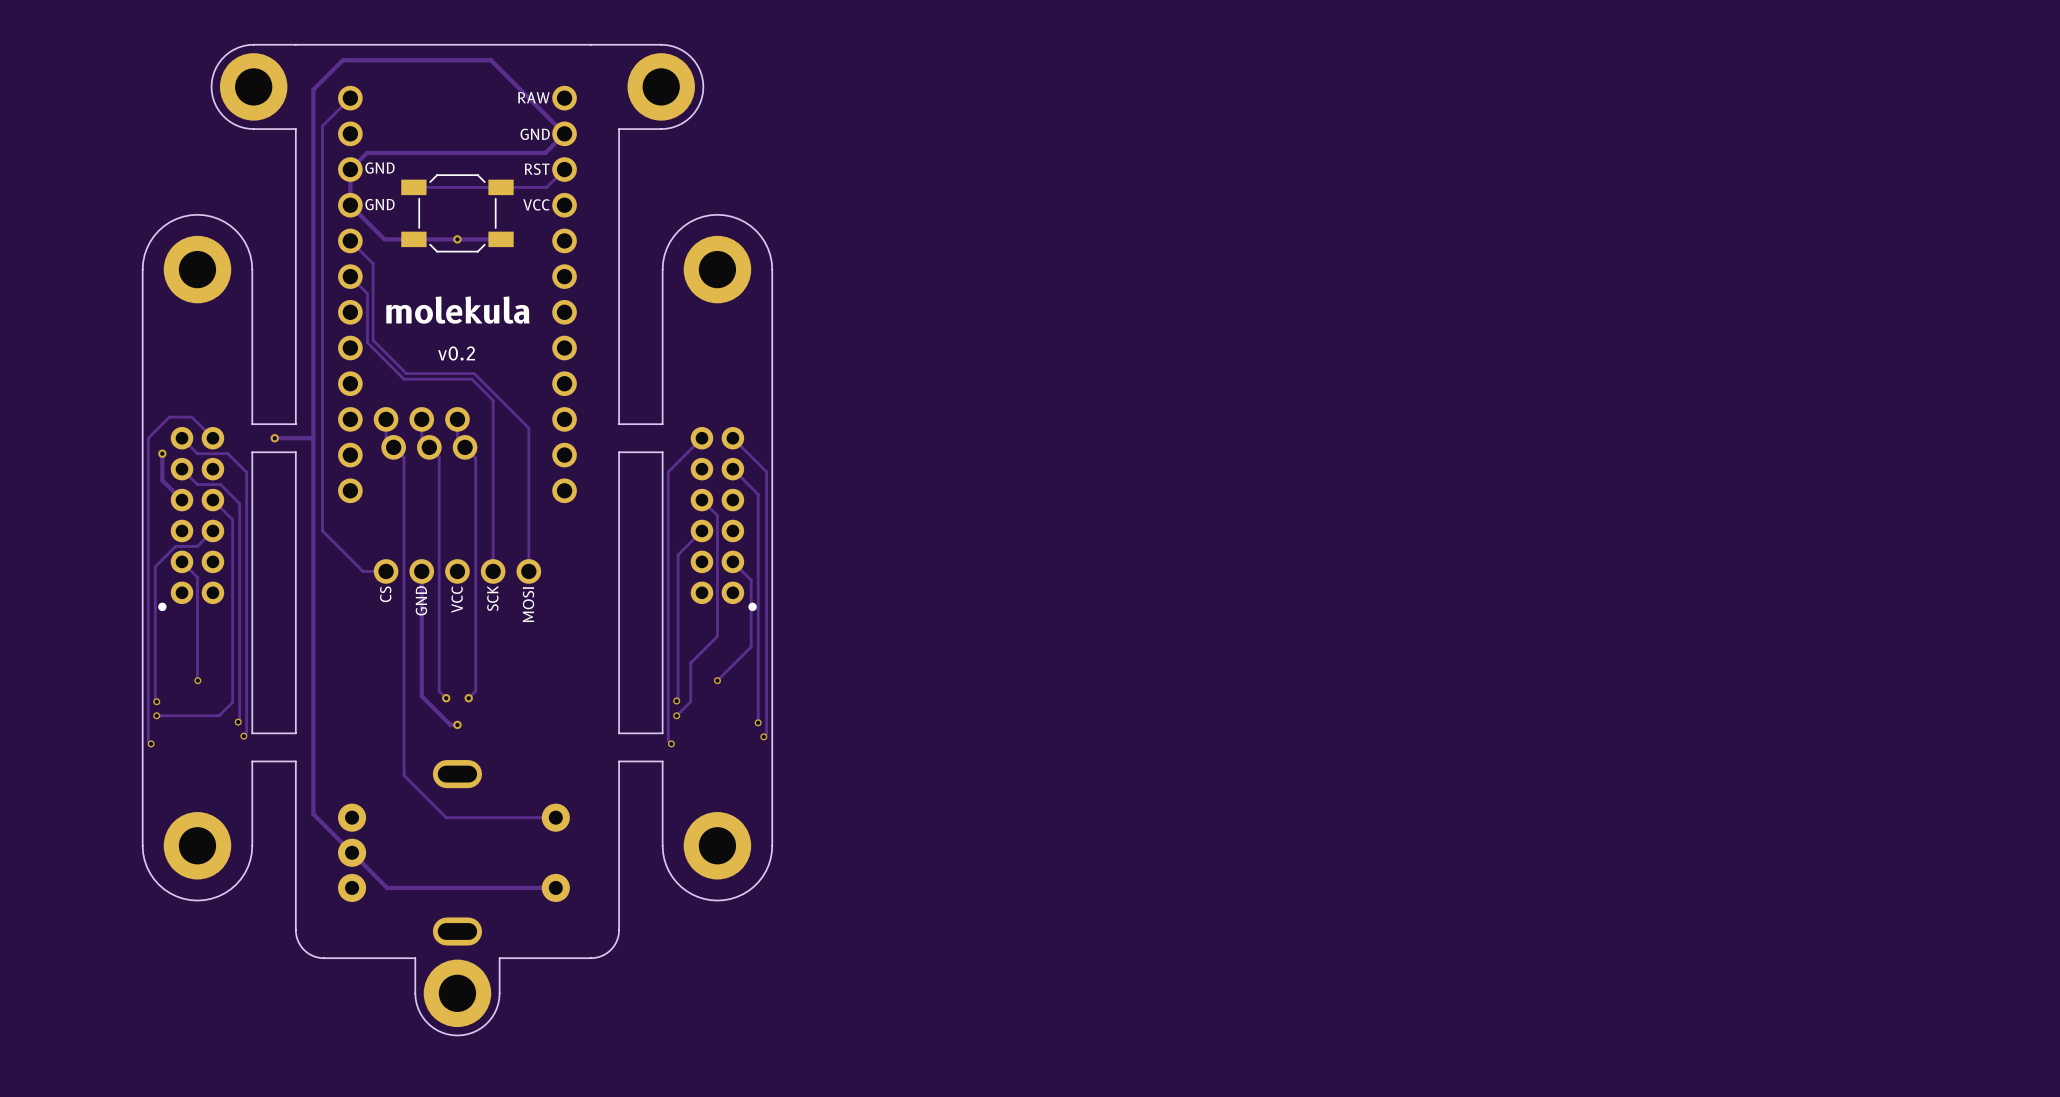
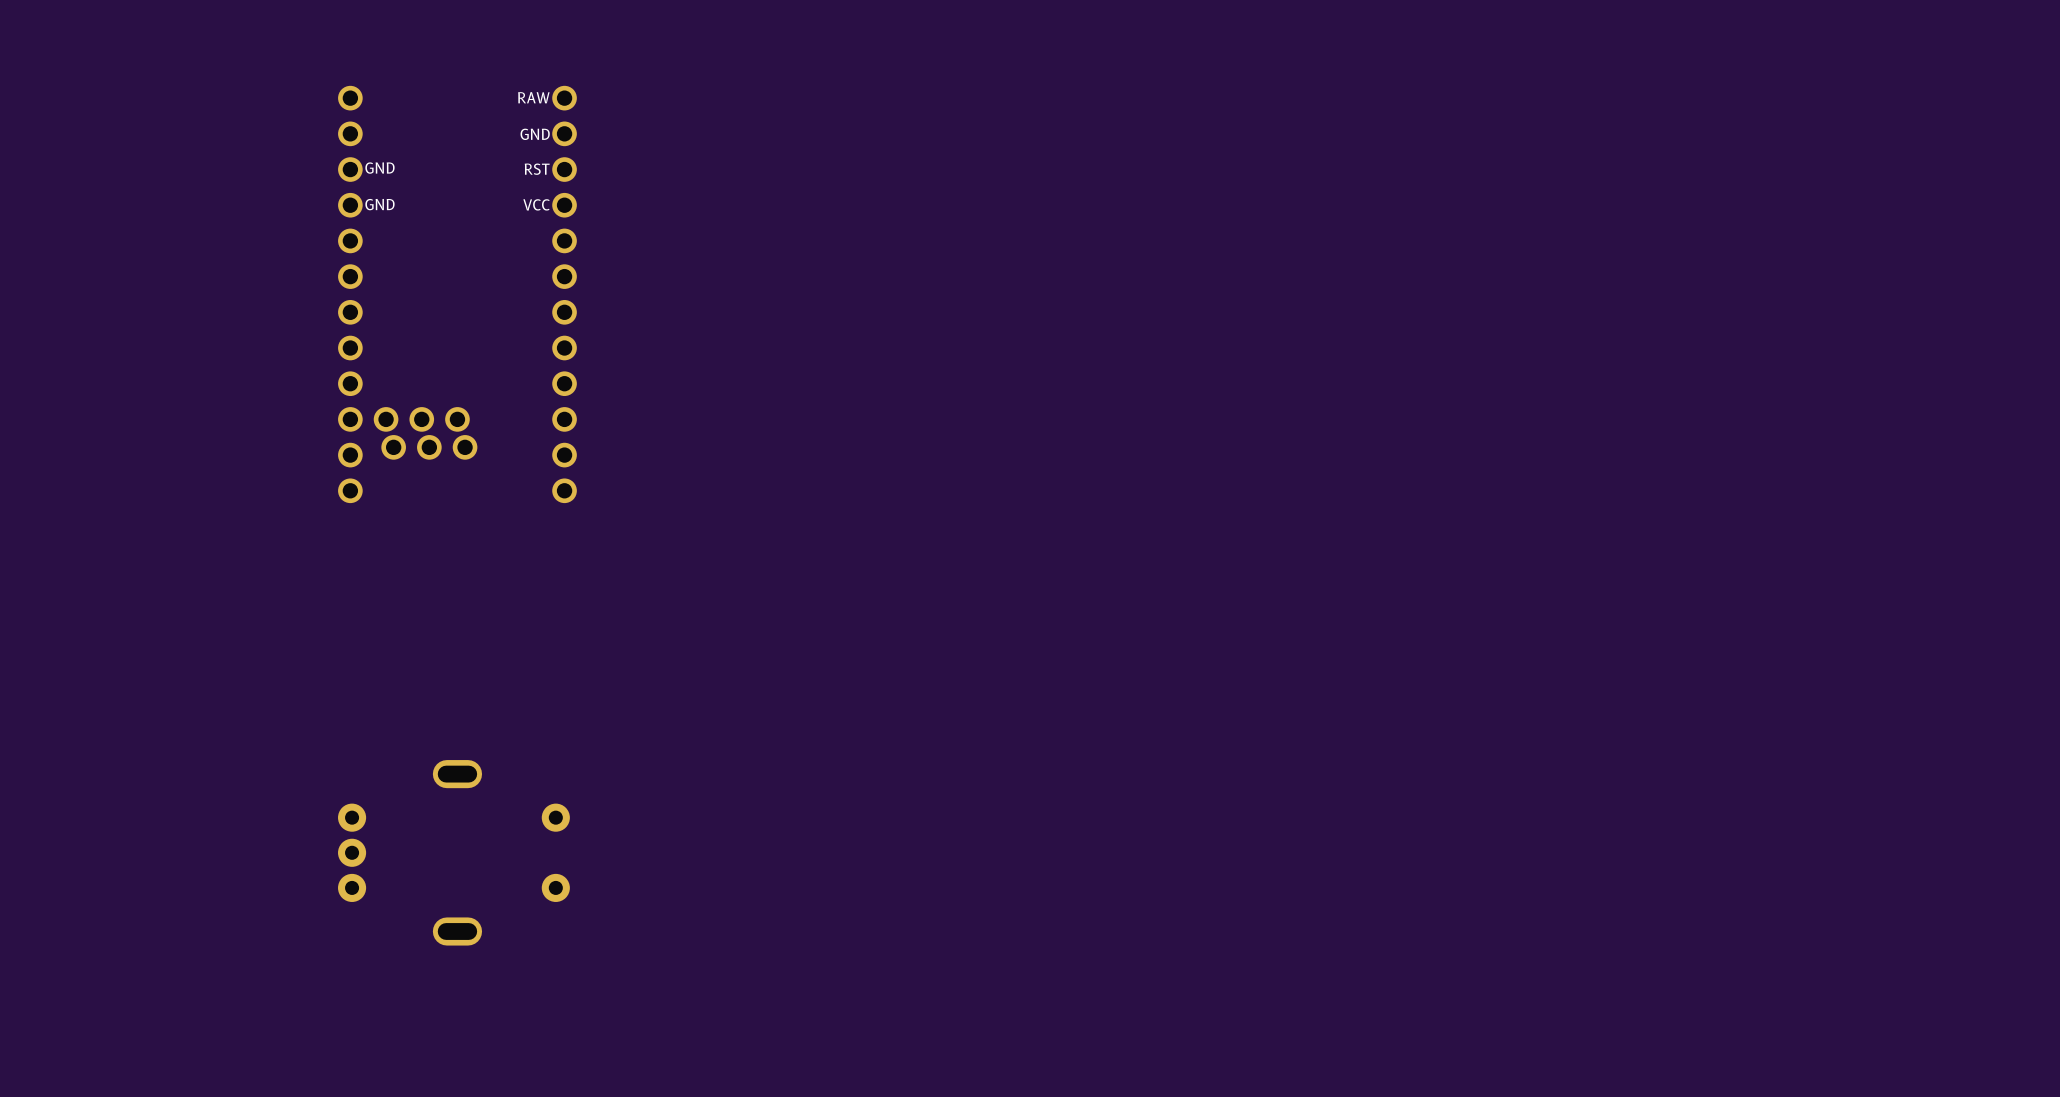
board edge: (661, 44) (253, 44) (234, 49) (222, 58) (214, 71) (211, 91) (216, 106) (225, 118) (234, 124) (248, 128) (295, 129) (295, 424) (252, 424) (251, 262) (244, 242) (236, 230) (224, 222) (211, 216) (197, 214) (183, 216) (170, 222) (158, 230) (150, 242) (144, 255) (142, 269) (142, 845) (146, 866) (154, 879) (164, 889) (183, 898) (197, 900) (211, 898) (230, 889) (244, 873) (251, 852) (252, 761) (295, 761) (295, 930) (300, 945) (309, 953) (320, 958) (415, 958) (415, 993) (418, 1008) (429, 1024) (447, 1034) (462, 1035) (472, 1032) (481, 1028) (492, 1017) (499, 998) (499, 958) (594, 958) (605, 953) (614, 945) (619, 930) (619, 761) (662, 761) (663, 852) (668, 871) (676, 882) (686, 890) (698, 897) (710, 900) (724, 900) (736, 897) (748, 890) (758, 882) (765, 871) (770, 858) (772, 845) (772, 269) (770, 255) (764, 242) (756, 230) (744, 222) (724, 215) (703, 216) (684, 226) (669, 242) (664, 255) (662, 269) (662, 424) (619, 424) (619, 129) (661, 129) (677, 125) (694, 112) (703, 92) (701, 75) (694, 61) (682, 50) (661, 44) -> none
part: (253, 86) -> none
part: (661, 86) -> none
track: (350, 98) (322, 125) (322, 530) (363, 571) (386, 571) -> none
track: (564, 169) (546, 187) (413, 187) -> none
part: (457, 213) -> none
via: (457, 239) -> none
track: (501, 239) (384, 239) (350, 205) (350, 169) (366, 152) (545, 152) (564, 133) (490, 60) (342, 60) (313, 89) (313, 814) (387, 887) (555, 887) -> none
track: (350, 240) (373, 263) (373, 340) (406, 373) (474, 373) (528, 428) (528, 571) -> none
part: (197, 269) -> none
part: (717, 269) -> none
track: (350, 276) (367, 293) (367, 342) (404, 379) (472, 379) (493, 400) (493, 571) -> none
text: molekula (457, 310) -> none
text: v0.2 (456, 353) -> none
track: (386, 419) (386, 439) (404, 457) (404, 775) (446, 817) (555, 817) -> none
track: (421, 419) (421, 439) (439, 457) (439, 691) (446, 698) -> none
track: (457, 419) (457, 439) (475, 458) (475, 691) (468, 698) -> none
track: (182, 438) (197, 453) (227, 453) (246, 472) (246, 733) (243, 736) -> none
track: (212, 438) (191, 417) (169, 417) (148, 438) (148, 741) (151, 743) -> none
via: (274, 438) -> none
track: (313, 438) (274, 438) -> none
track: (701, 438) (668, 471) (668, 740) (671, 743) -> none
track: (732, 438) (766, 471) (766, 734) (763, 736) -> none
board edge: (295, 452) (295, 733) (252, 733) (252, 452) (295, 452) -> none
board edge: (662, 452) (662, 733) (619, 733) (619, 452) (662, 452) -> none
track: (162, 453) (162, 480) (182, 500) -> none
via: (162, 453) -> none
track: (182, 469) (197, 484) (220, 484) (239, 503) (238, 722) -> none
track: (732, 469) (758, 494) (758, 722) -> none
track: (212, 500) (232, 519) (232, 702) (219, 715) (156, 715) -> none
track: (701, 500) (717, 515) (717, 636) (690, 663) (690, 701) (676, 715) -> none
part: (191, 519) -> none
part: (723, 519) -> none
track: (212, 530) (197, 546) (175, 546) (155, 566) (156, 701) -> none
track: (701, 530) (678, 554) (676, 701) -> none
track: (182, 561) (197, 577) (197, 680) -> none
track: (732, 561) (751, 580) (751, 646) (717, 680) -> none
track: (421, 571) (421, 696) (450, 724) (457, 724) -> none
part: (457, 571) -> none
via: (197, 680) -> none
via: (717, 680) -> none
via: (446, 698) -> none
via: (468, 698) -> none
via: (156, 701) -> none
via: (676, 701) -> none
via: (156, 715) -> none
via: (676, 715) -> none
via: (238, 722) -> none
via: (758, 722) -> none
via: (457, 724) -> none
via: (243, 736) -> none
via: (763, 736) -> none
via: (151, 743) -> none
via: (671, 743) -> none
part: (197, 845) -> none
part: (717, 845) -> none
part: (457, 993) -> none

